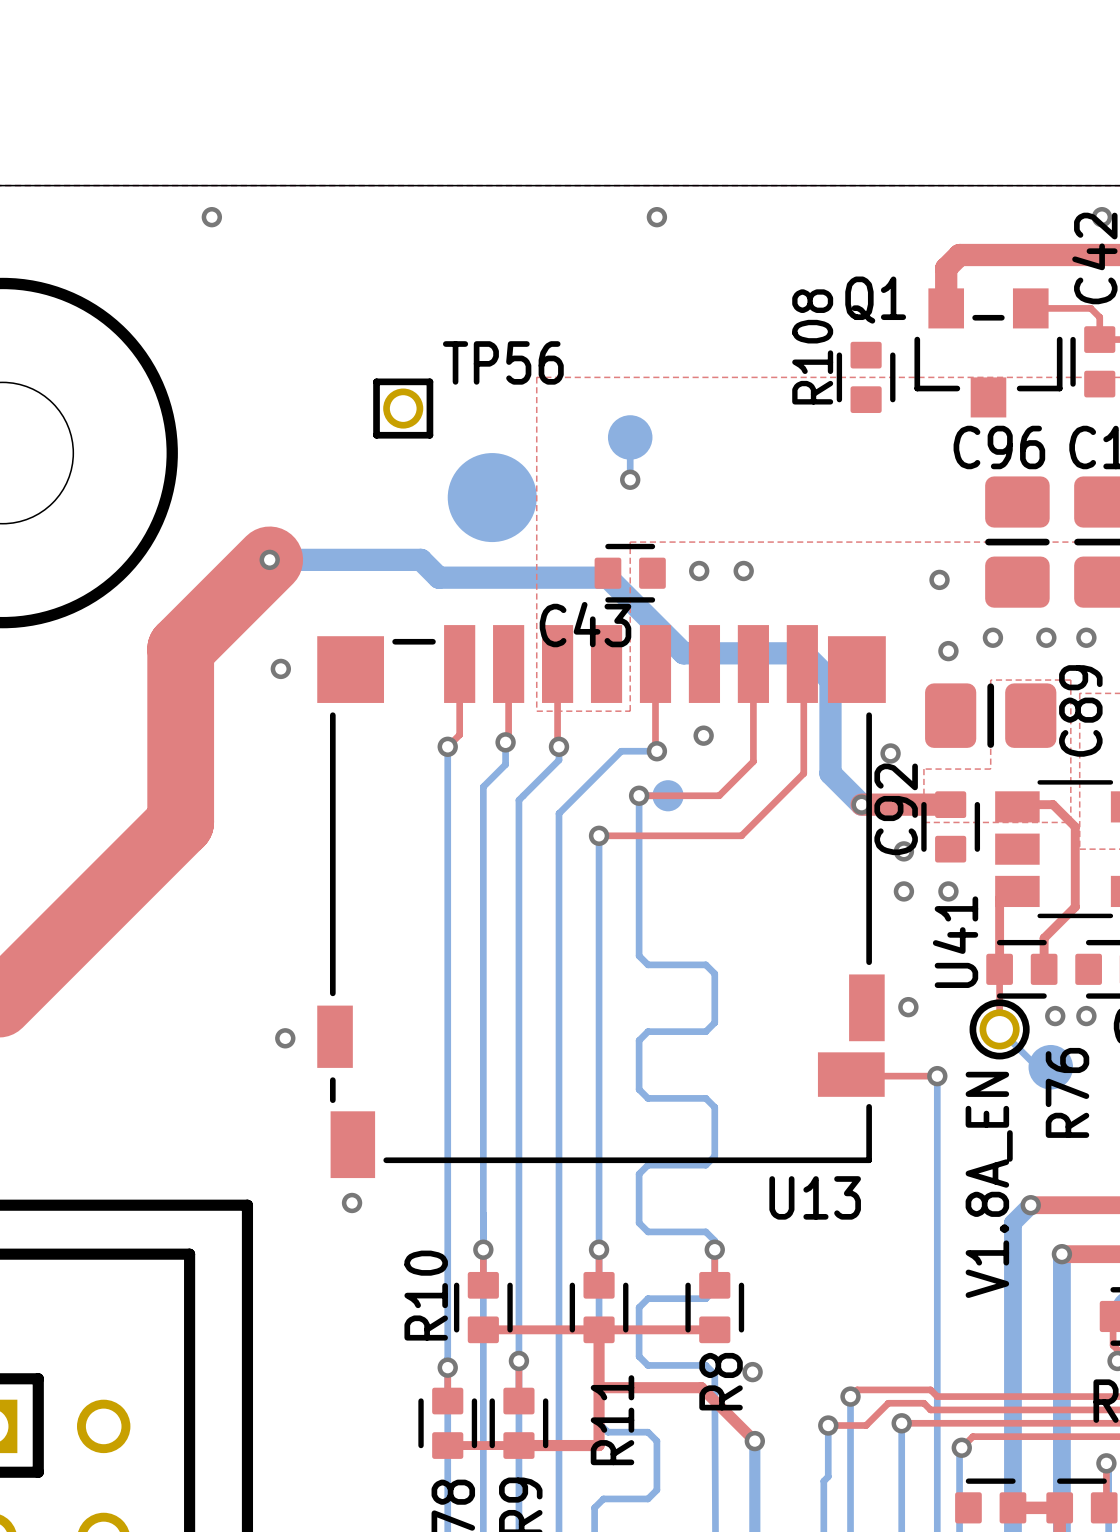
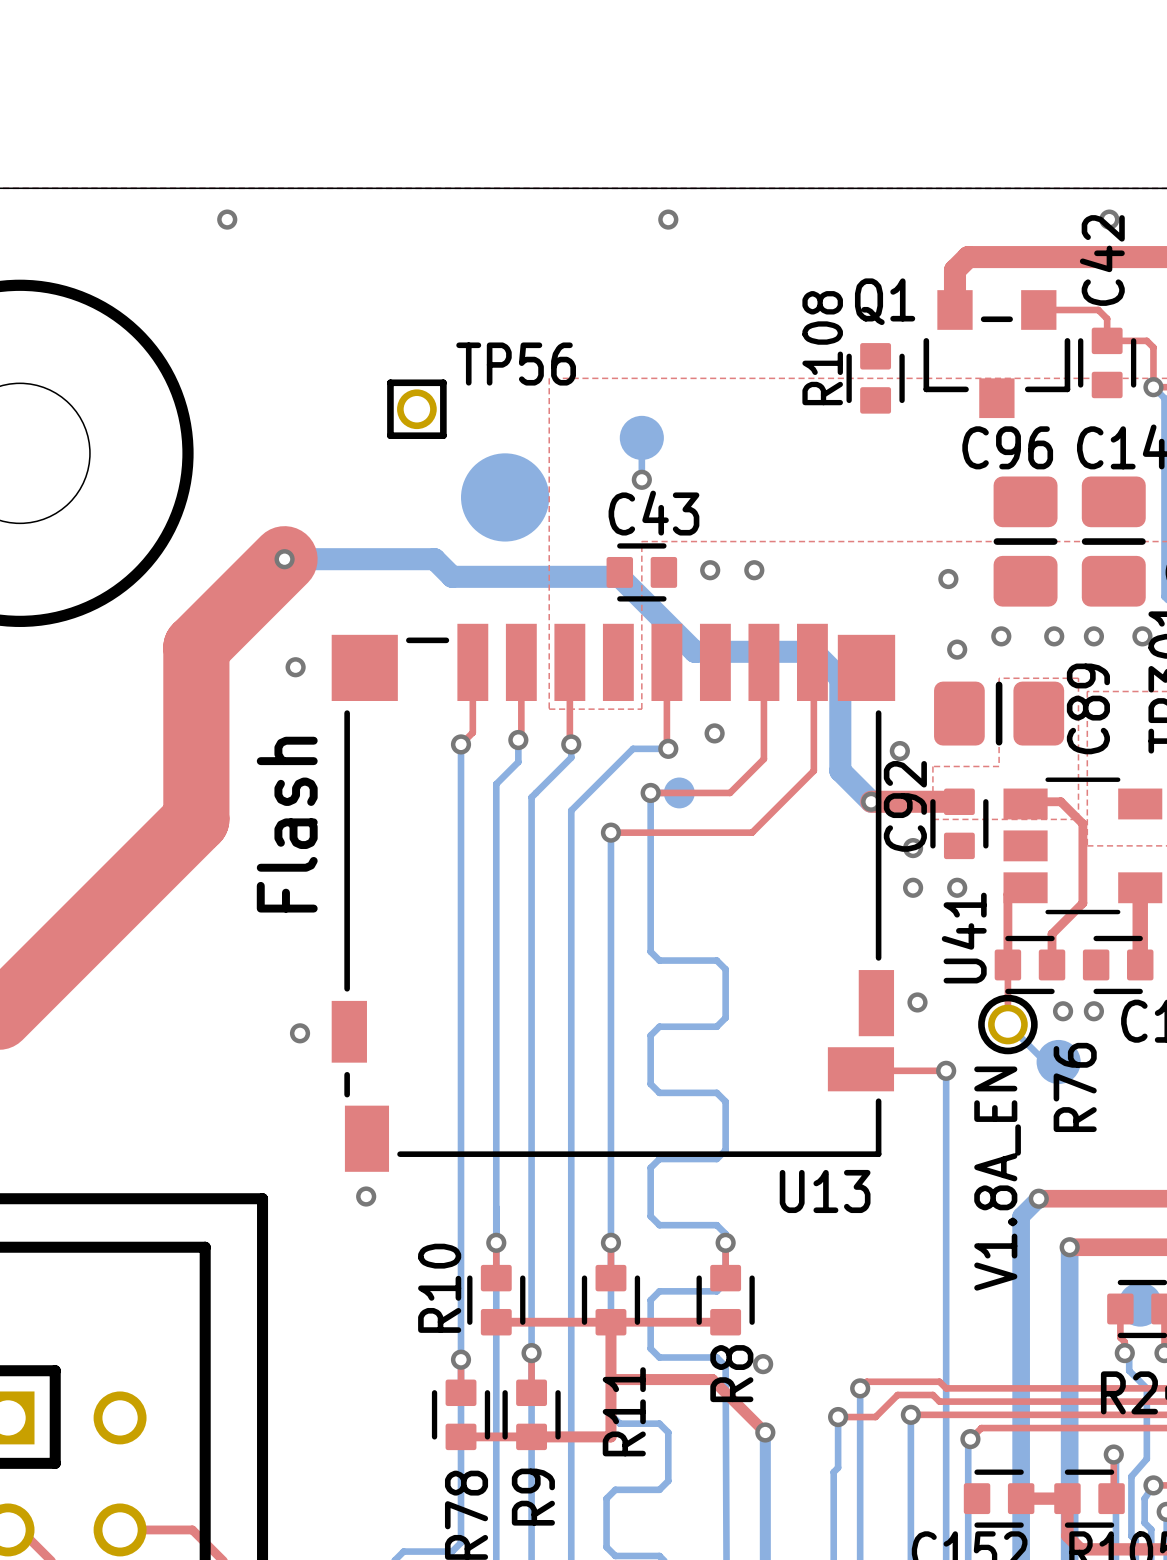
C43 name position: C43 (585, 624) -> C43 (653, 513)
text: none -> Flash (287, 824)

